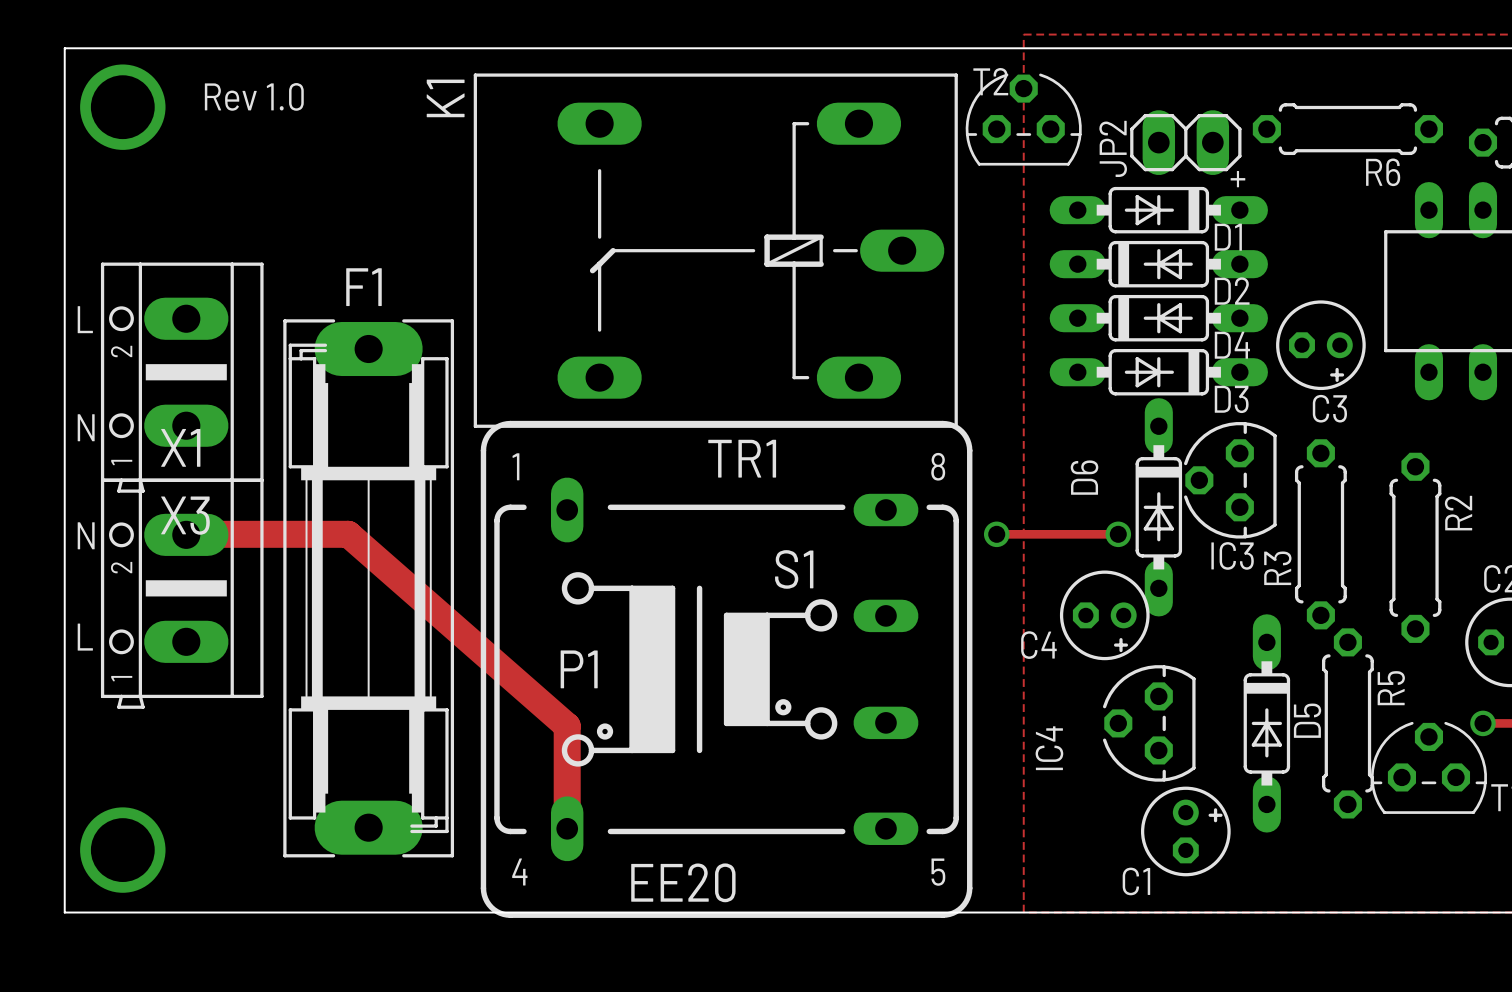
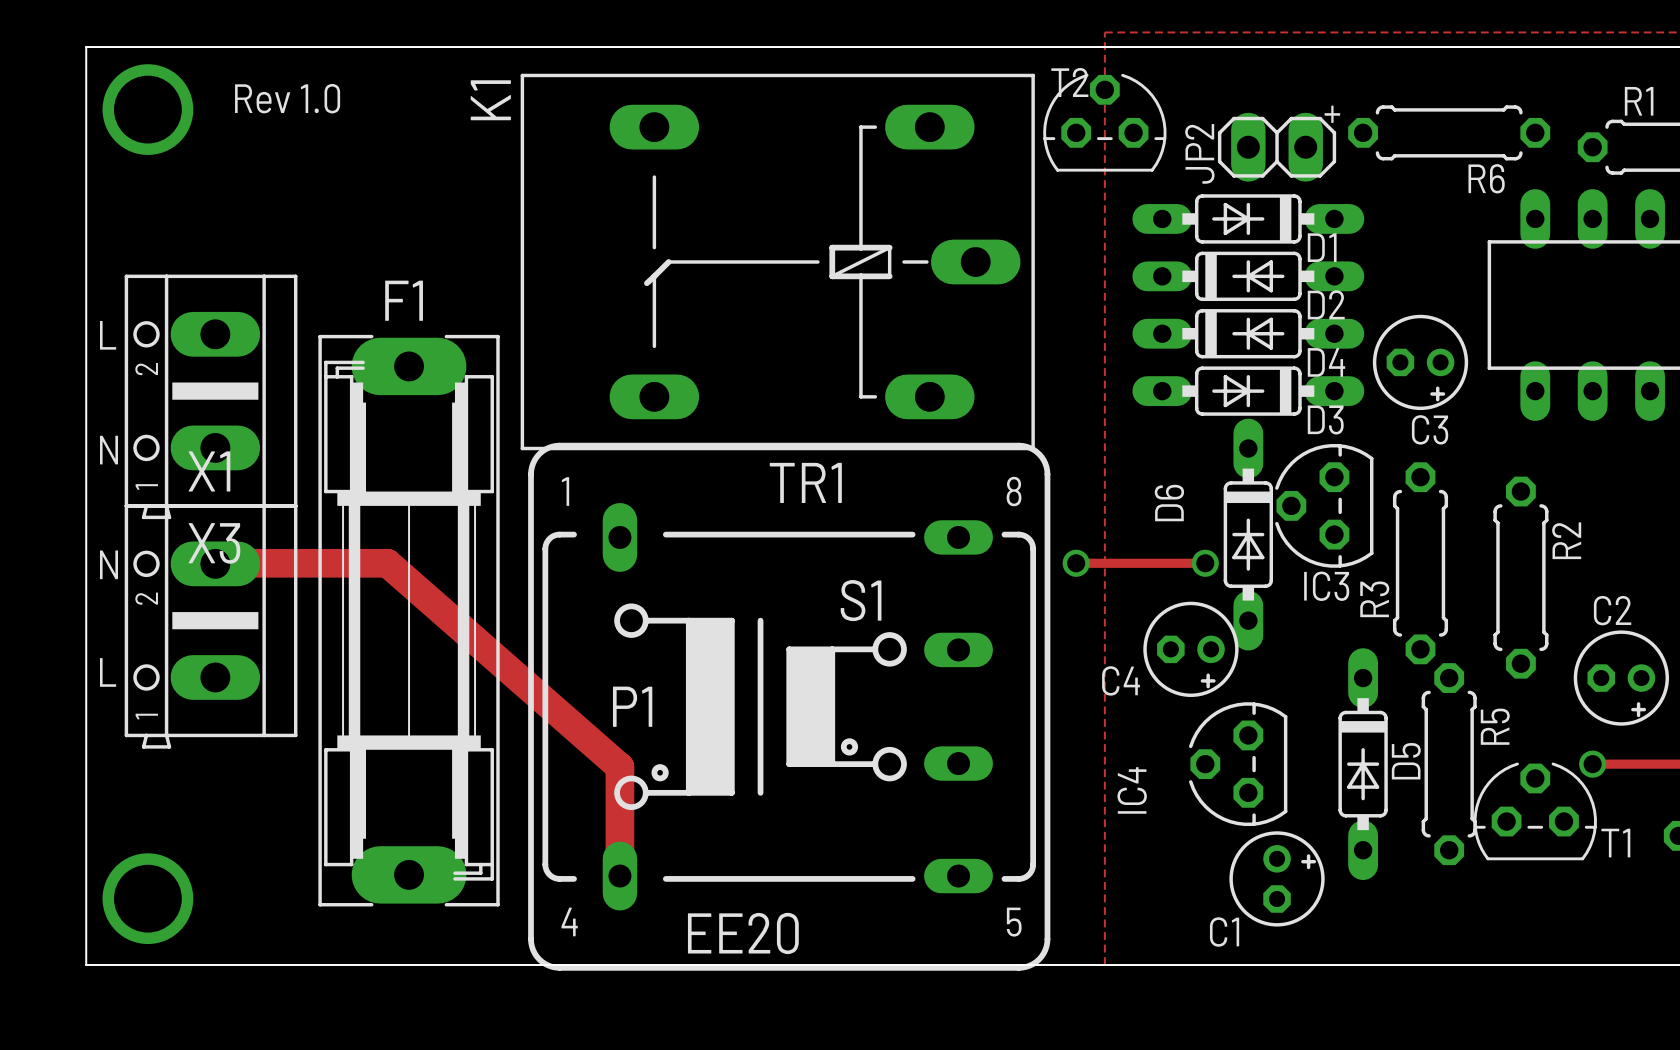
text position: + (1237, 179) -> + (1332, 114)

